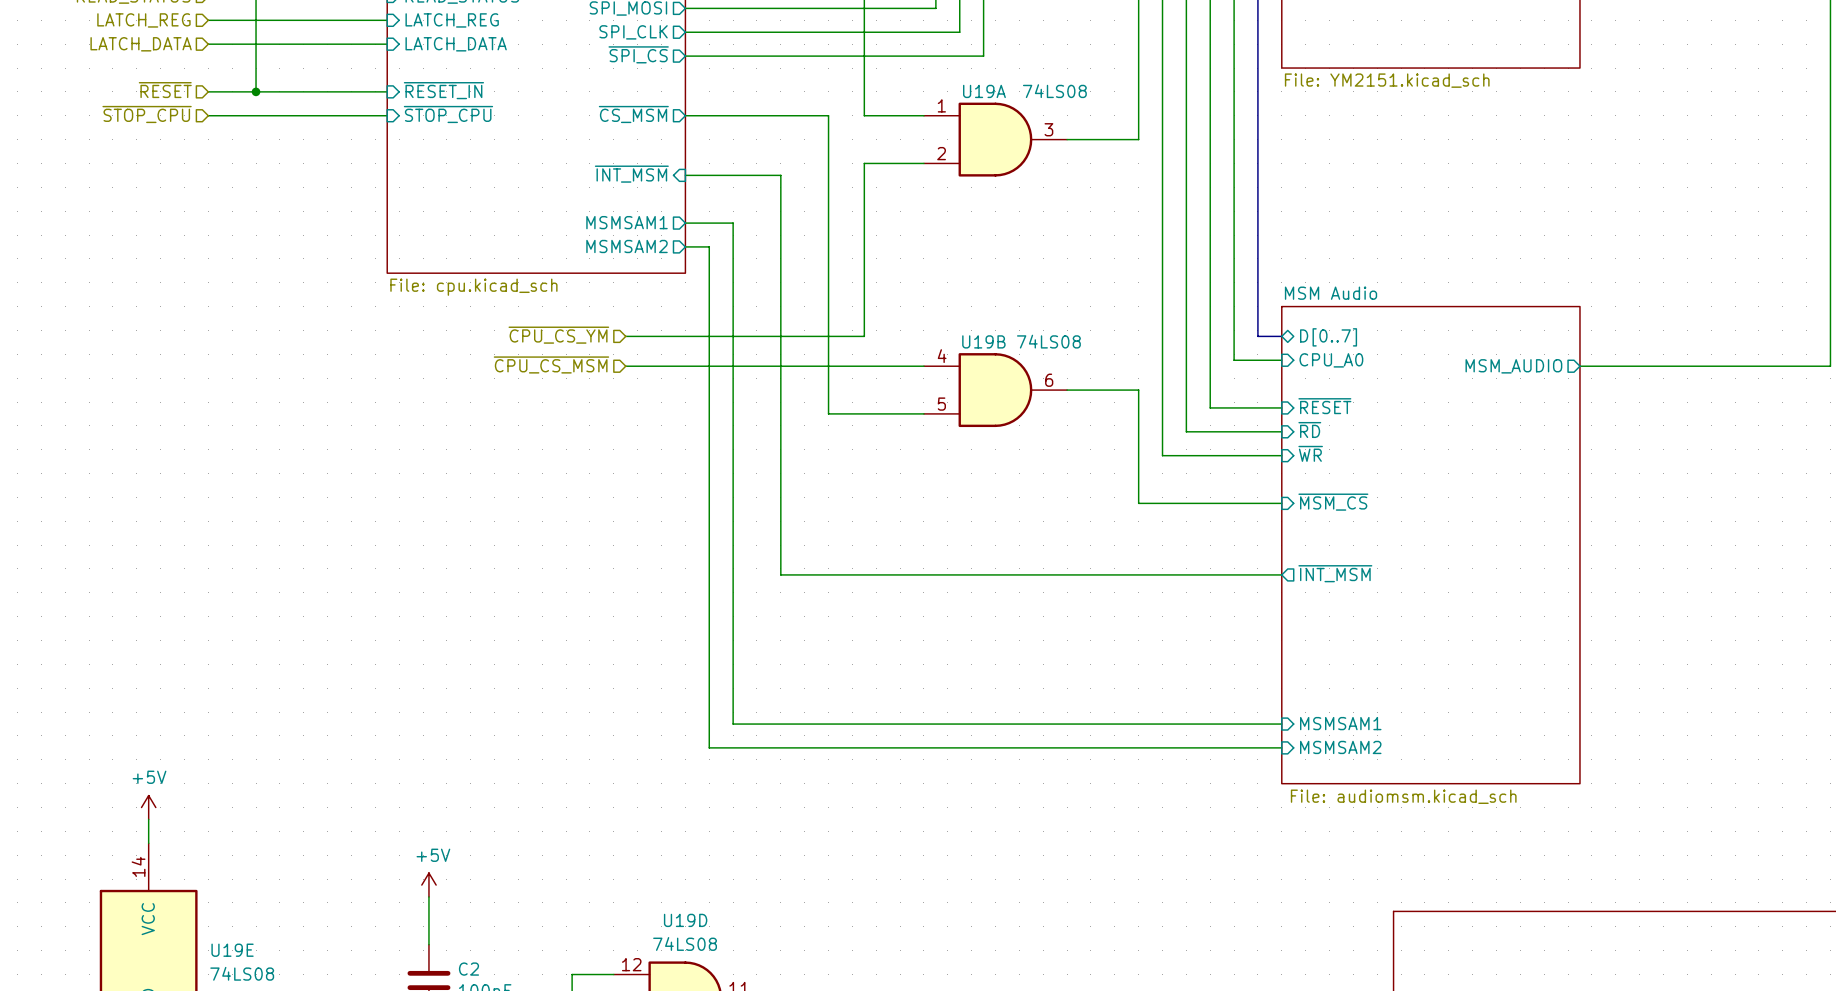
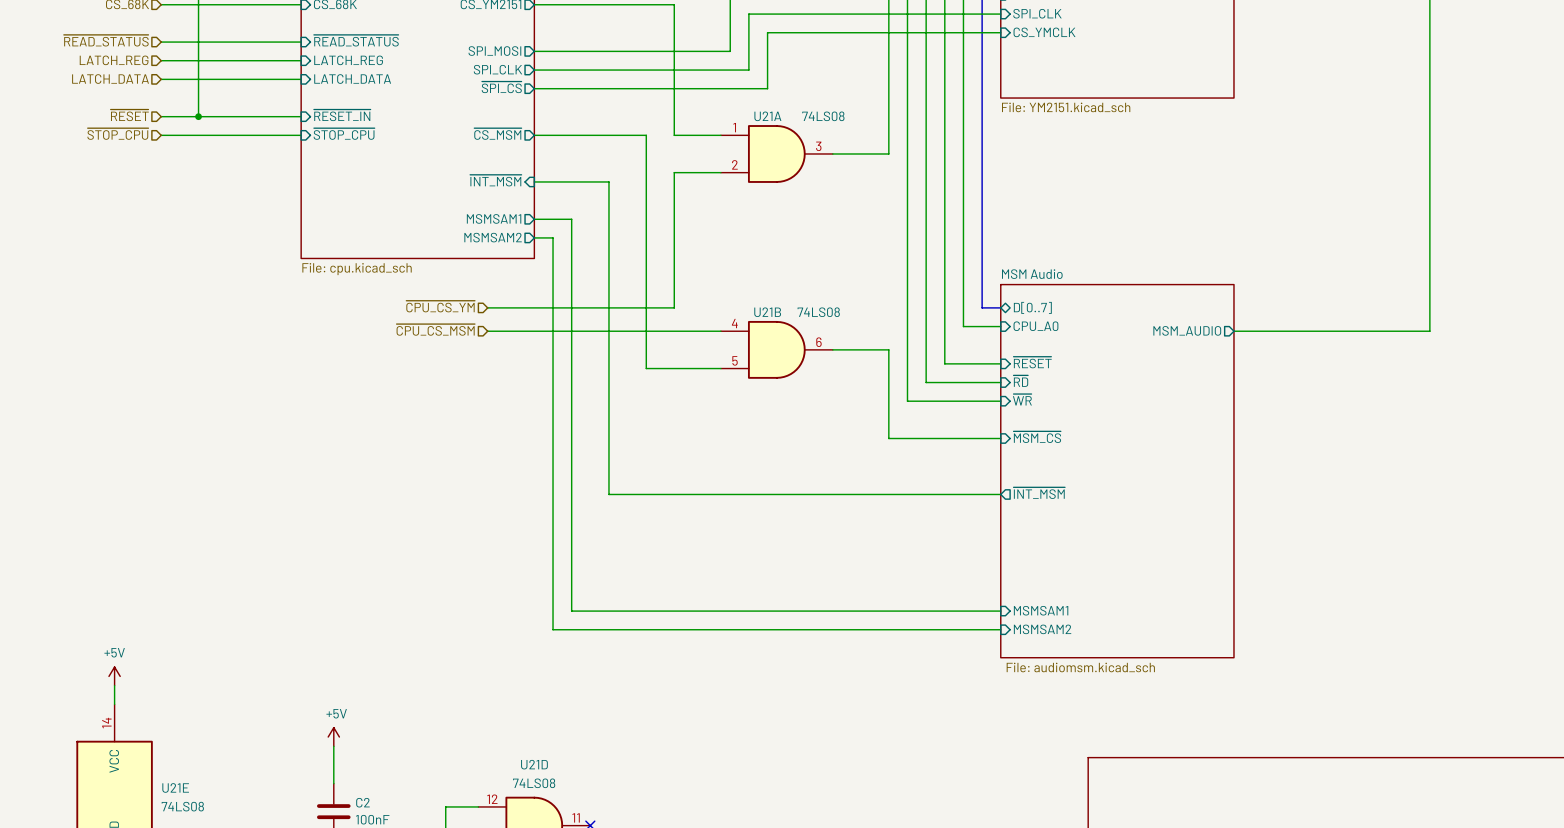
U19A name: U19A (984, 91) -> U21A (767, 116)
U19B name: U19B (983, 341) -> U21B (767, 312)
U19D name: U19D (685, 920) -> U21D (534, 764)
U19E name: U19E (232, 950) -> U21E (175, 787)

